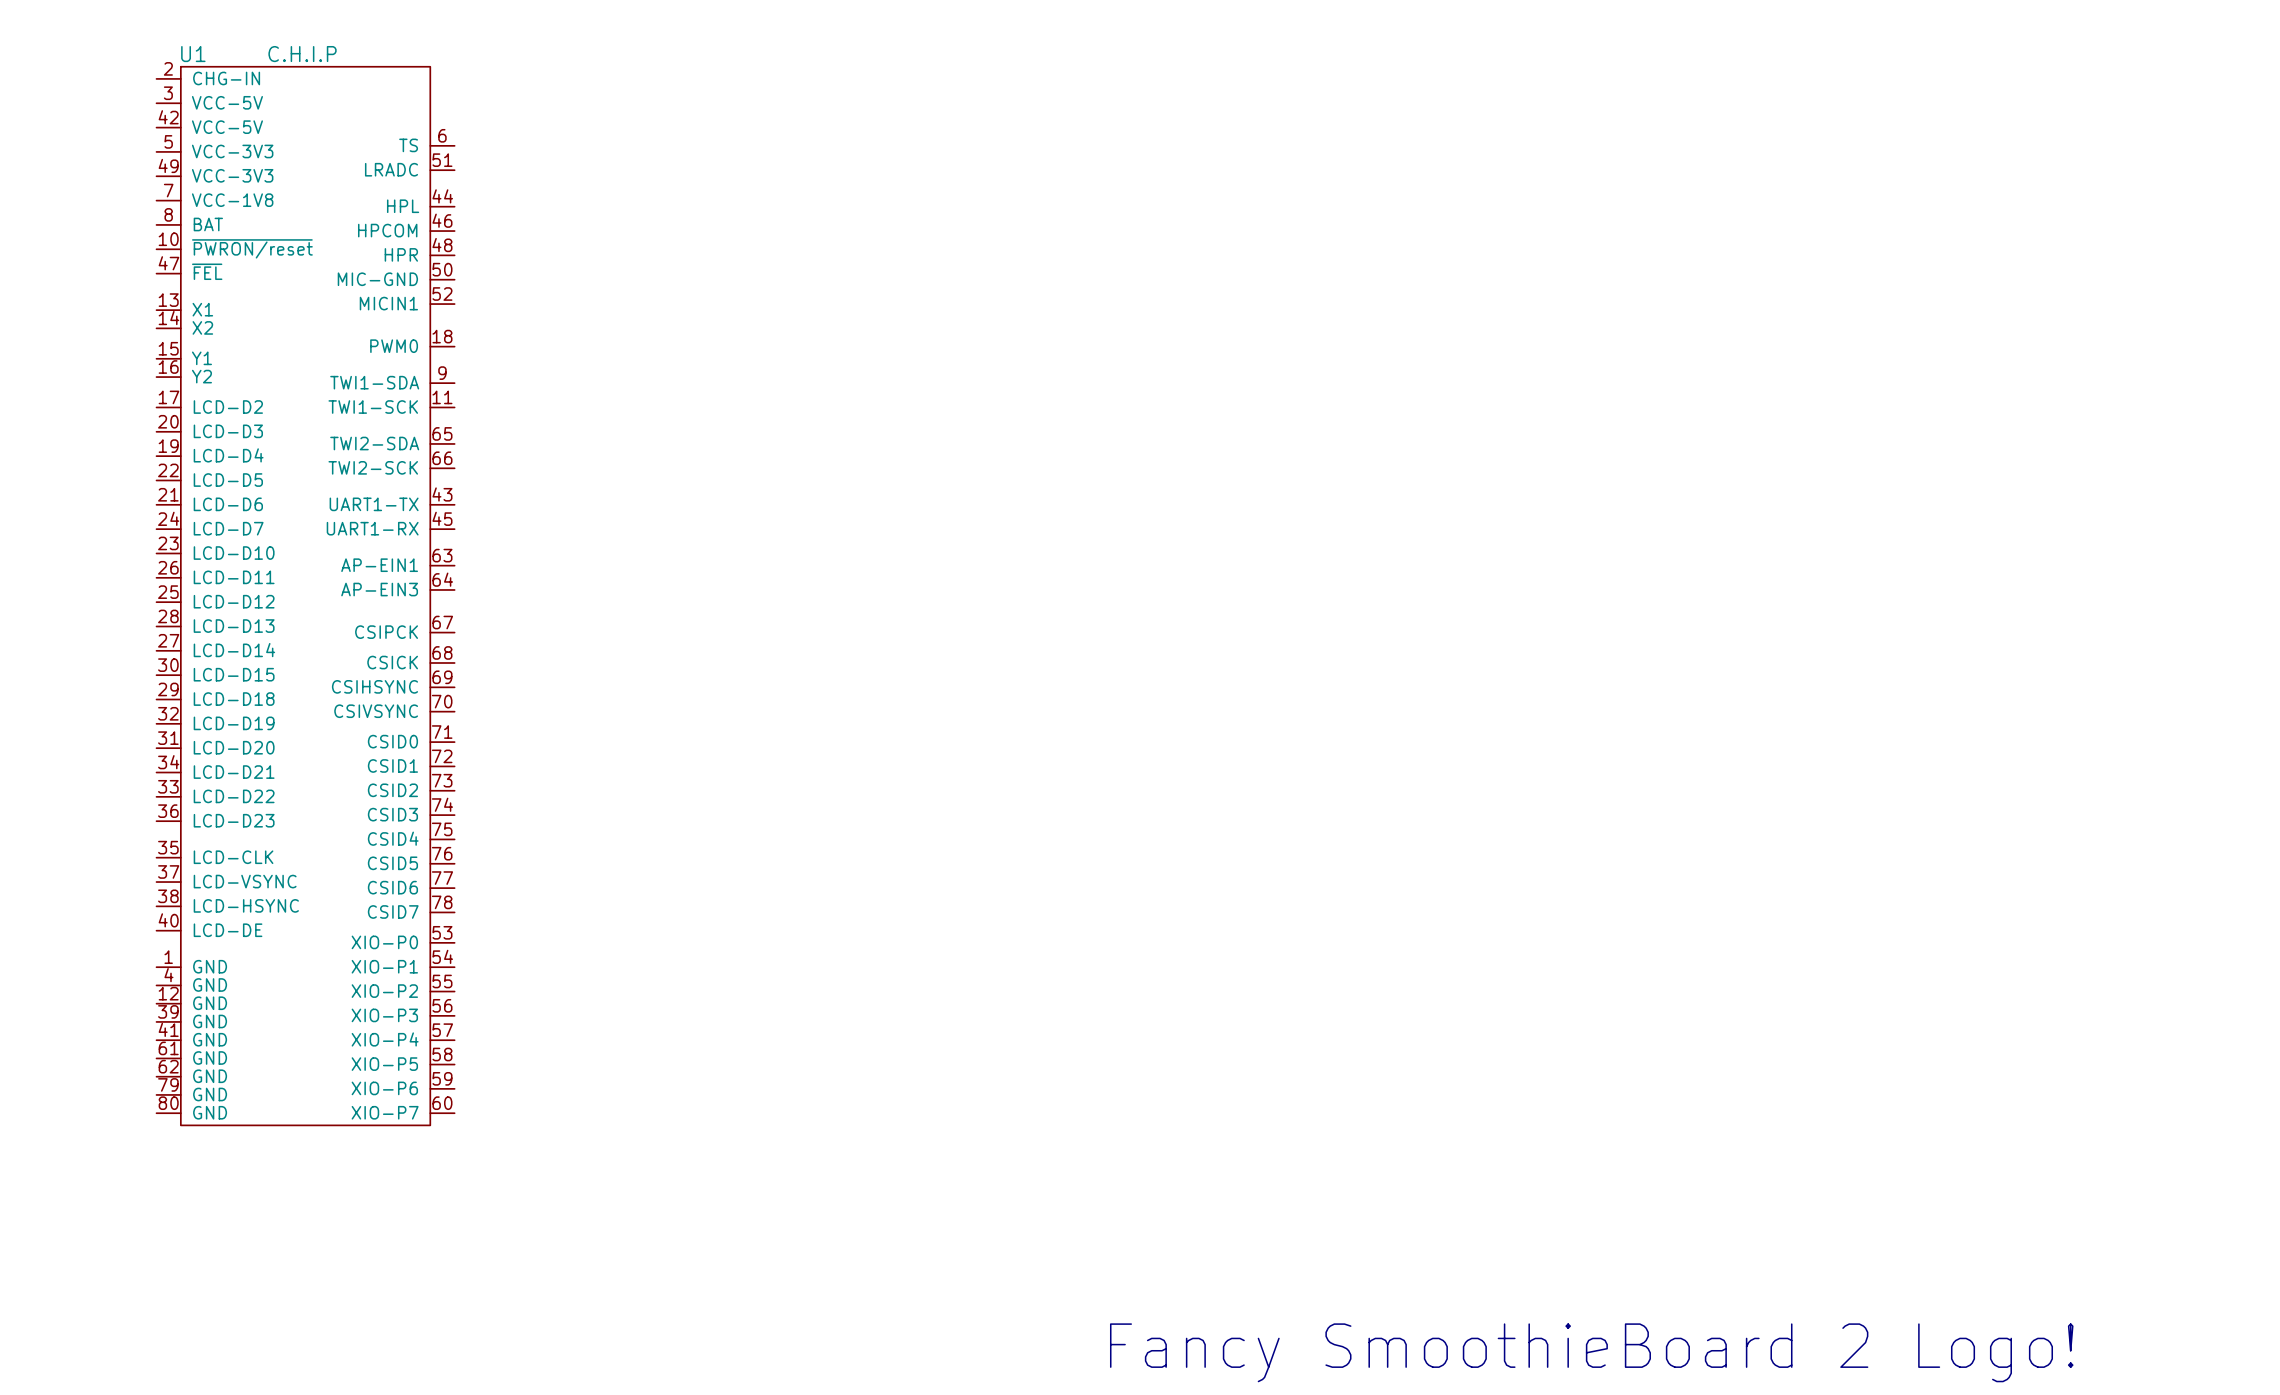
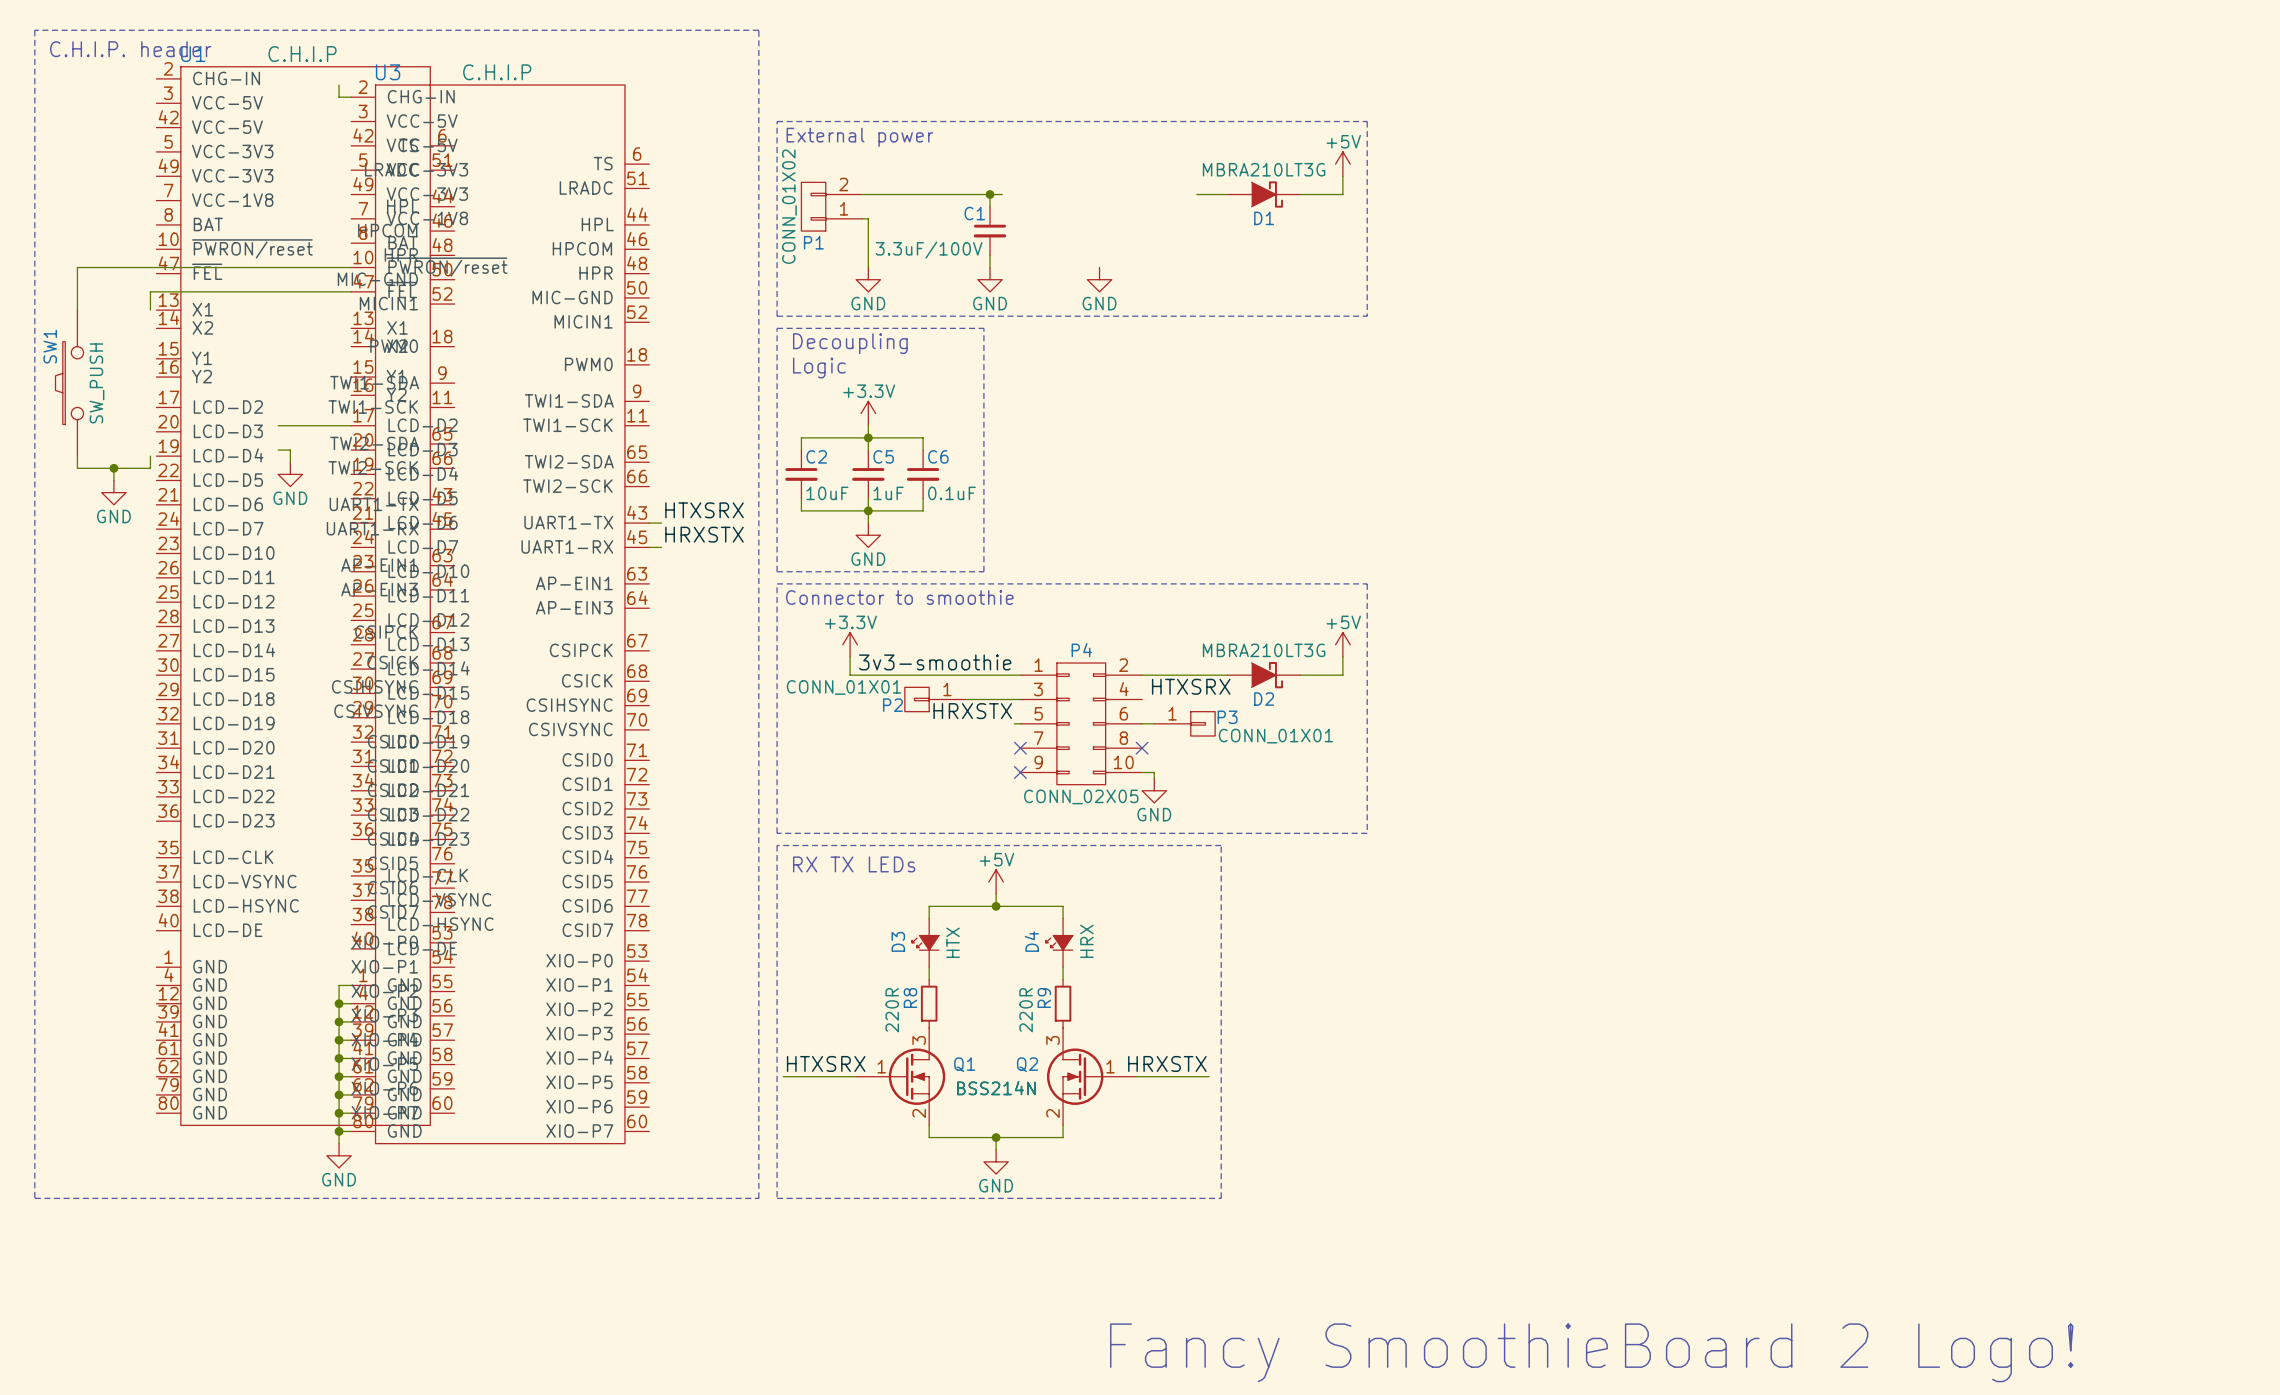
line: none -> (34, 30) (758, 30) (758, 1198) (34, 1198) (34, 30)
text: none -> C.H.I.P. header (130, 49)
wire: none -> (339, 85) (339, 97) (351, 97)
line: none -> (777, 121) (777, 316) (1367, 316) (1367, 121) (777, 121)
text: none -> External power (859, 137)
power symbol: none -> +5V (1342, 164)
wire: none -> (1342, 176) (1342, 194) (1300, 194)
wire: none -> (862, 194) (1002, 194)
wire: none -> (990, 194) (990, 206)
junction: none -> (990, 194)
wire: none -> (1196, 194) (1227, 194)
D1: none -> MBRA210LT3G (1263, 194)
P1: none -> CONN_01X02 (831, 206)
wire: none -> (862, 218) (868, 218) (868, 267)
C1: none -> 3.3uF/100V (990, 231)
wire: none -> (990, 255) (990, 267)
wire: none -> (351, 267) (77, 267) (77, 310)
power symbol: none -> GND (868, 279)
power symbol: none -> GND (990, 279)
power symbol: none -> GND (1099, 279)
wire: none -> (351, 291) (150, 291) (150, 310)
line: none -> (777, 328) (777, 571) (983, 571) (983, 328) (777, 328)
text: none -> Decoupling (850, 343)
text: none -> Logic (819, 368)
SW1: none -> SW_PUSH (69, 383)
power symbol: none -> +3.3V (868, 413)
wire: none -> (278, 425) (351, 425)
wire: none -> (868, 425) (868, 450)
junction: none -> (868, 437)
wire: none -> (278, 450) (290, 450) (290, 462)
wire: none -> (801, 450) (801, 437) (923, 437) (923, 450)
wire: none -> (77, 456) (77, 468) (150, 468) (150, 456)
wire: none -> (113, 468) (113, 480)
junction: none -> (113, 468)
power symbol: none -> GND (290, 474)
C2: none -> 10uF (801, 474)
C5: none -> 1uF (868, 474)
C6: none -> 0.1uF (923, 474)
power symbol: none -> GND (113, 492)
wire: none -> (801, 498) (801, 510) (923, 510) (923, 498)
wire: none -> (868, 498) (868, 523)
label: none -> HTXSRX (704, 510)
junction: none -> (868, 510)
wire: none -> (649, 523) (661, 523)
label: none -> HRXSTX (704, 534)
power symbol: none -> GND (868, 535)
wire: none -> (649, 547) (661, 547)
line: none -> (777, 583) (777, 833) (1367, 833) (1367, 583) (777, 583)
text: none -> Connector to smoothie (899, 597)
U3: none -> C.H.I.P (500, 614)
power symbol: none -> +3.3V (850, 644)
power symbol: none -> +5V (1342, 644)
wire: none -> (850, 656) (850, 675) (1020, 675)
wire: none -> (1342, 656) (1342, 675) (1300, 675)
label: none -> 3v3-smoothie (935, 662)
wire: none -> (1142, 675) (1227, 675)
D2: none -> MBRA210LT3G (1263, 675)
label: none -> HTXSRX (1191, 686)
P2: none -> CONN_01X01 (935, 699)
wire: none -> (965, 699) (1020, 699)
label: none -> HRXSTX (972, 711)
wire: none -> (1014, 723) (1020, 723)
P4: none -> CONN_02X05 (1081, 723)
wire: none -> (1142, 723) (1154, 723)
P3: none -> CONN_01X01 (1184, 723)
no-connect mark: none -> (1020, 748)
no-connect mark: none -> (1142, 748)
no-connect mark: none -> (1020, 772)
wire: none -> (1142, 772) (1154, 772) (1154, 778)
power symbol: none -> GND (1154, 790)
line: none -> (777, 845) (777, 1198) (1221, 1198) (1221, 845) (777, 845)
text: none -> RX TX LEDs (854, 864)
power symbol: none -> +5V (996, 882)
wire: none -> (996, 894) (996, 906)
junction: none -> (996, 906)
wire: none -> (929, 918) (929, 906) (1063, 906) (1063, 918)
D3: none -> HTX (925, 942)
D4: none -> HRX (1059, 942)
wire: none -> (929, 967) (929, 979)
wire: none -> (1063, 967) (1063, 979)
wire: none -> (351, 985) (339, 985) (339, 1143)
wire: none -> (339, 1003) (351, 1003)
junction: none -> (339, 1003)
R8: none -> 220R (929, 1003)
R9: none -> 220R (1063, 1003)
wire: none -> (339, 1021) (351, 1021)
junction: none -> (339, 1021)
wire: none -> (339, 1040) (351, 1040)
junction: none -> (339, 1040)
wire: none -> (339, 1058) (351, 1058)
junction: none -> (339, 1058)
label: none -> HTXSRX (826, 1063)
label: none -> HRXSTX (1167, 1063)
wire: none -> (339, 1076) (351, 1076)
junction: none -> (339, 1076)
wire: none -> (783, 1076) (856, 1076)
Q1: none -> BSS214N (900, 1076)
Q2: none -> BSS214N (1091, 1076)
wire: none -> (1136, 1076) (1209, 1076)
wire: none -> (339, 1094) (351, 1094)
junction: none -> (339, 1094)
wire: none -> (339, 1113) (351, 1113)
junction: none -> (339, 1113)
wire: none -> (929, 1125) (929, 1137) (1063, 1137) (1063, 1125)
wire: none -> (339, 1131) (351, 1131)
junction: none -> (339, 1131)
wire: none -> (996, 1137) (996, 1149)
junction: none -> (996, 1137)
power symbol: none -> GND (339, 1155)
power symbol: none -> GND (996, 1161)

